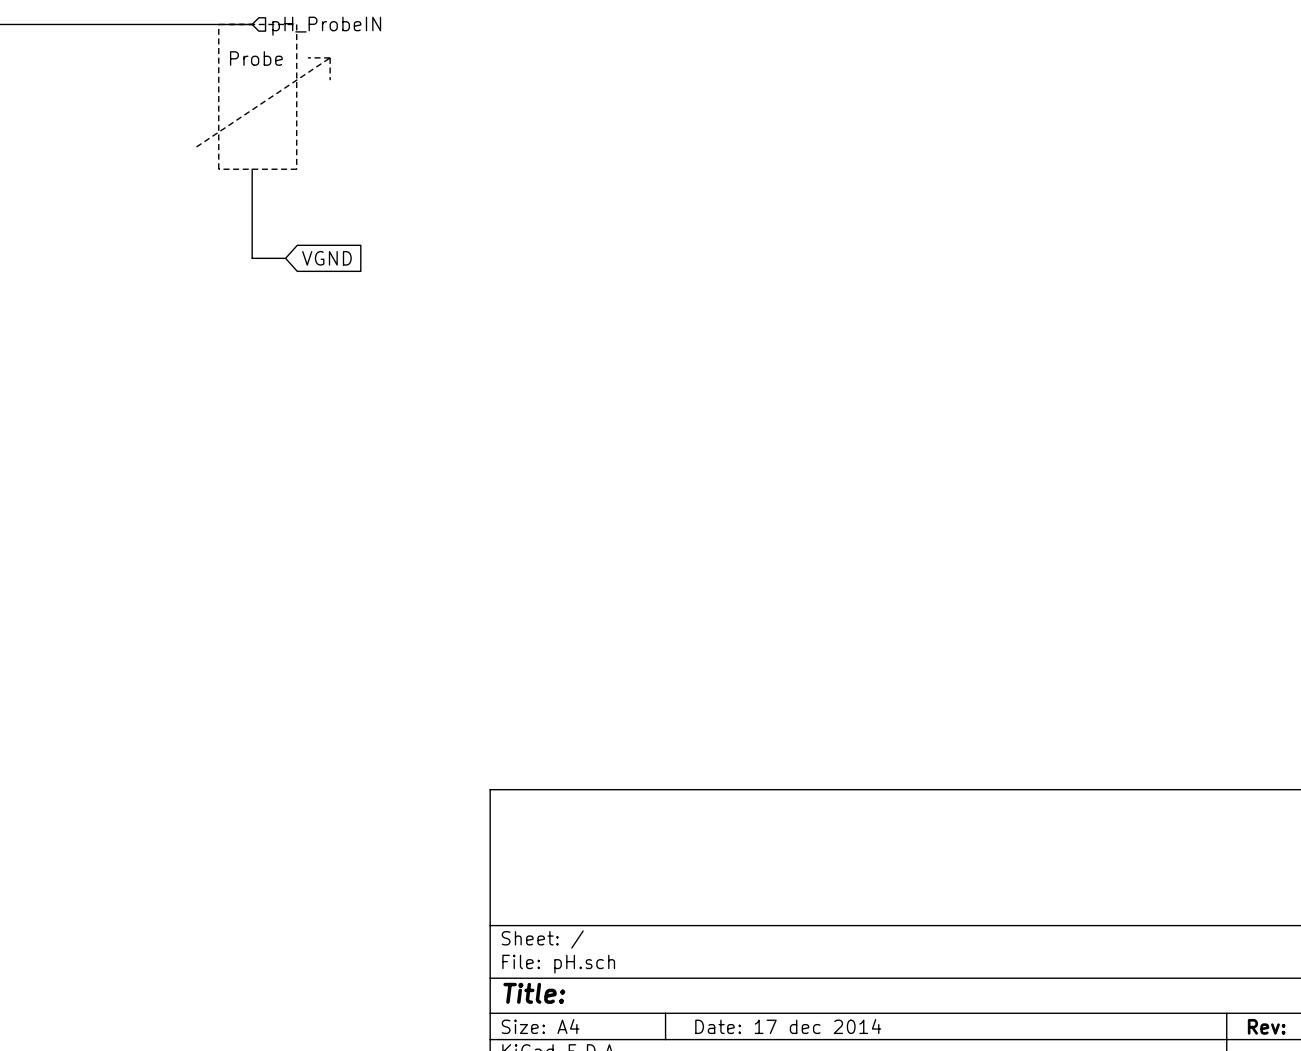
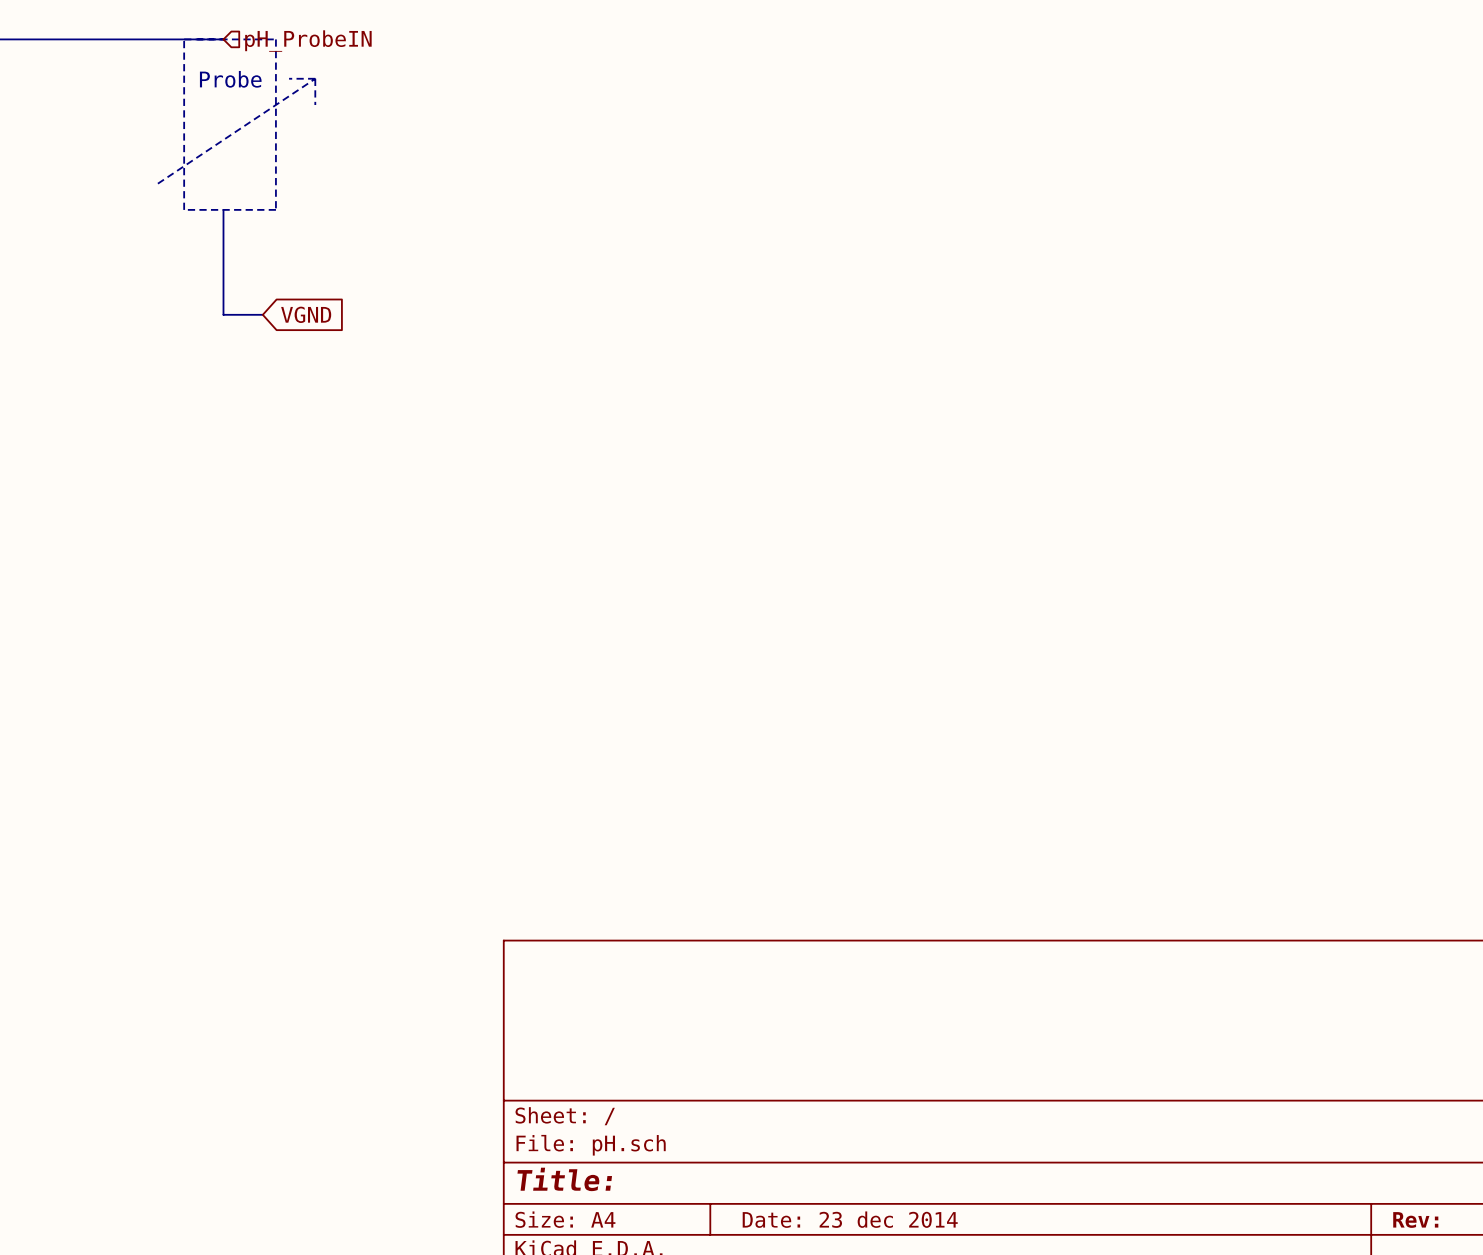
title block: Date: 17 dec 2014 (788, 1026) -> Date: 23 dec 2014 (850, 1219)

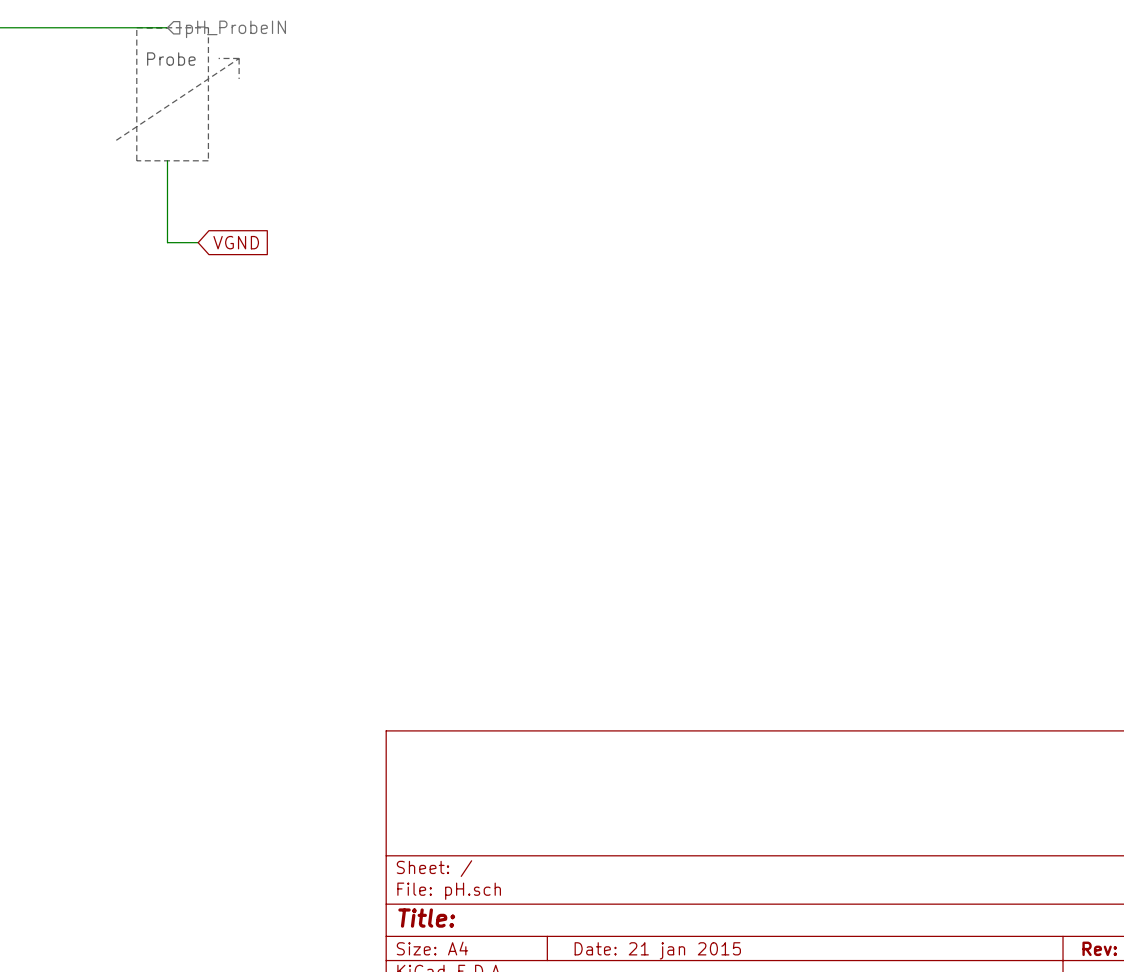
title block: Date: 23 dec 2014 (850, 1219) -> Date: 21 jan 2015 (657, 950)

